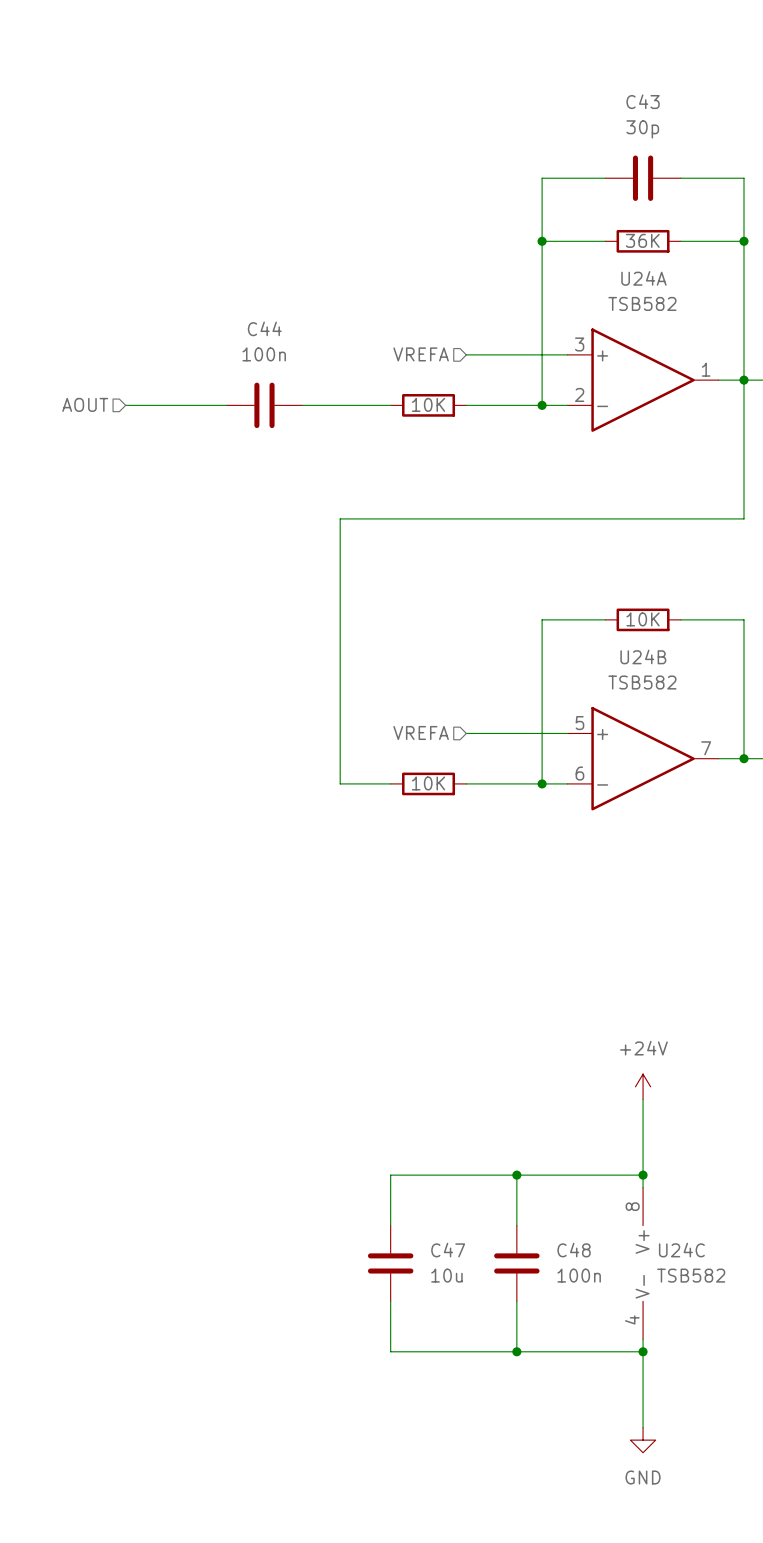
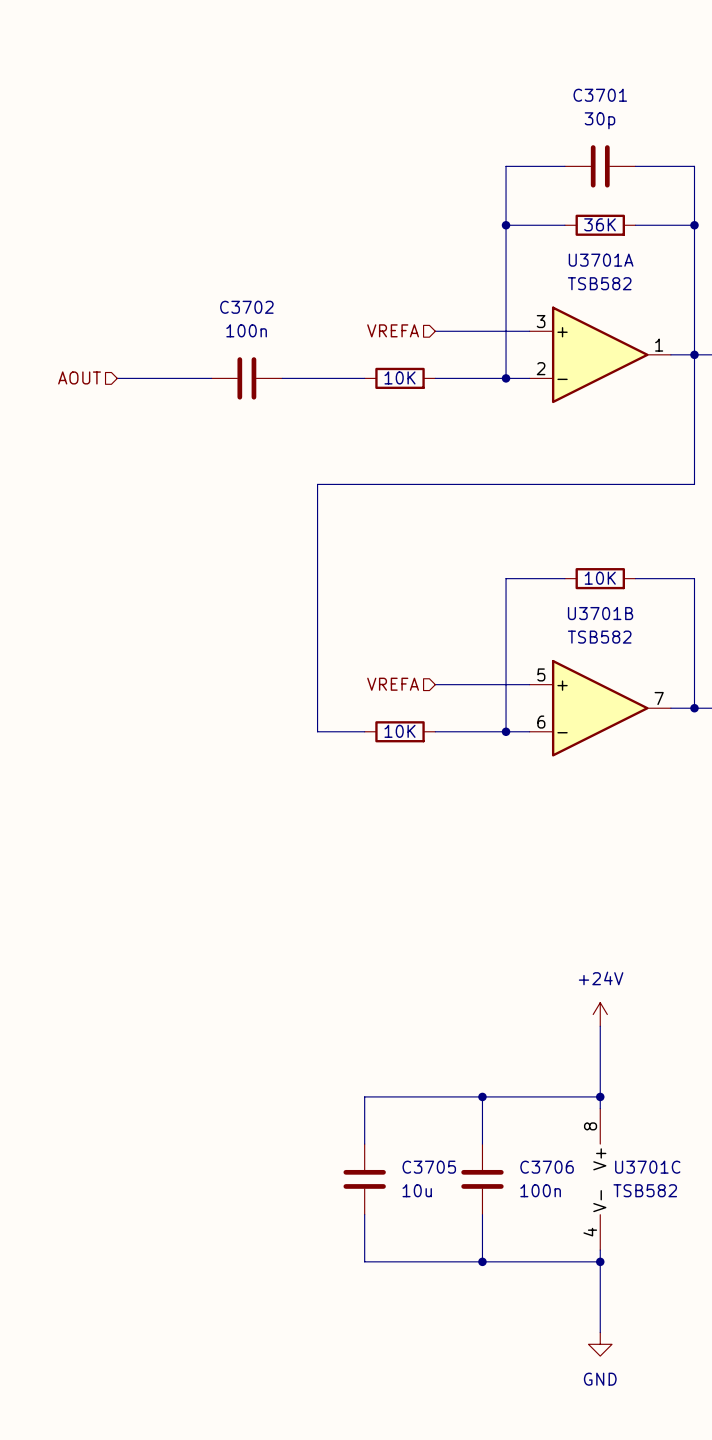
C43 name: C43 (643, 101) -> C3701 (600, 95)
U24A name: U24A (643, 278) -> U3701A (601, 260)
C44 name: C44 (264, 328) -> C3702 (246, 307)
U24B name: U24B (643, 656) -> U3701B (600, 613)
C47 name: C47 (448, 1250) -> C3705 (429, 1167)
C48 name: C48 (574, 1250) -> C3706 (547, 1167)
U24C name: U24C (681, 1250) -> U3701C (647, 1167)

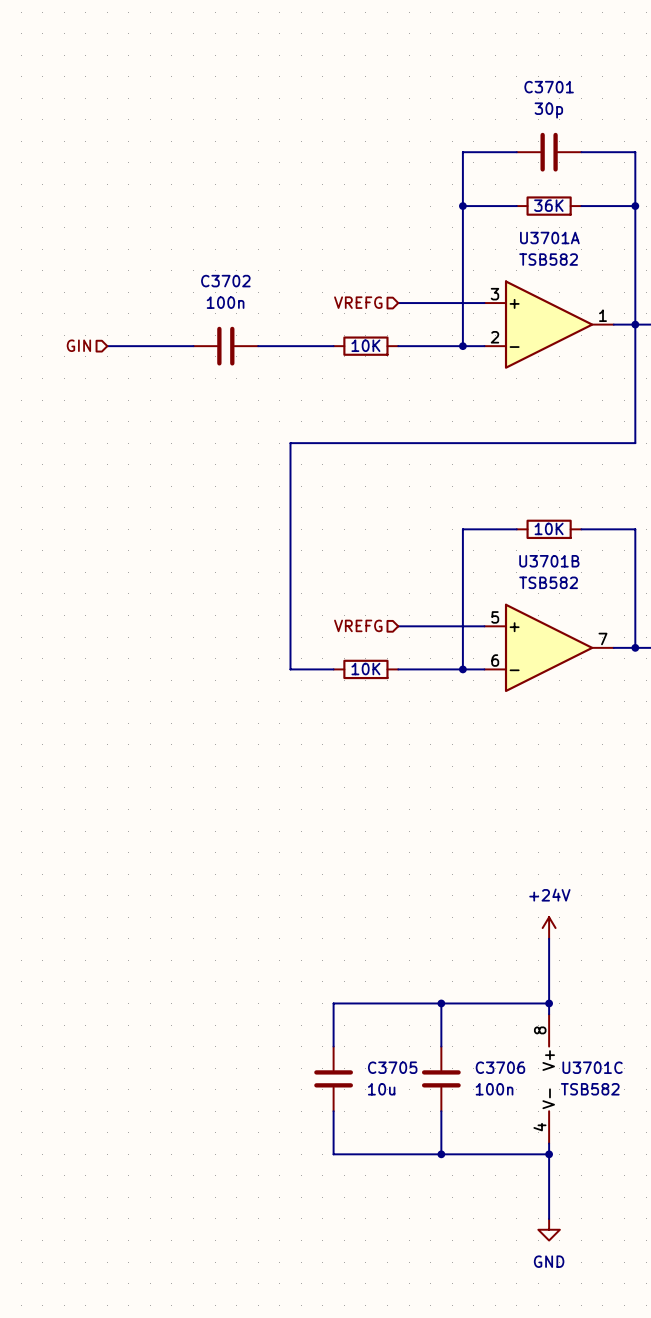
hierarchical label: VREFA (393, 330) -> VREFG (358, 302)
hierarchical label: AOUT (79, 377) -> GIN (78, 345)
hierarchical label: VREFA (393, 684) -> VREFG (358, 625)

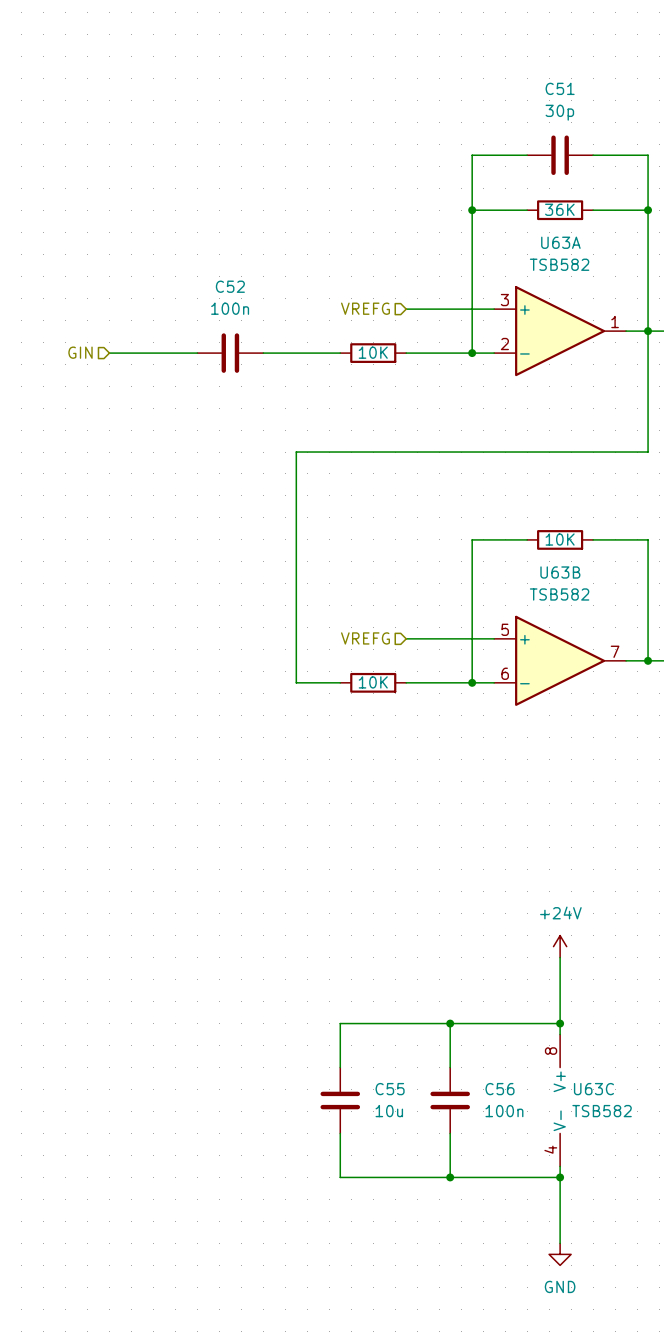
C3701 name: C3701 (549, 87) -> C51 (560, 88)
U3701A name: U3701A (549, 237) -> U63A (560, 242)
C3702 name: C3702 (225, 281) -> C52 (230, 286)
U3701B name: U3701B (549, 561) -> U63B (560, 572)
C3705 name: C3705 (392, 1067) -> C55 (390, 1089)
C3706 name: C3706 (500, 1067) -> C56 (500, 1089)
U3701C name: U3701C (592, 1067) -> U63C (593, 1089)

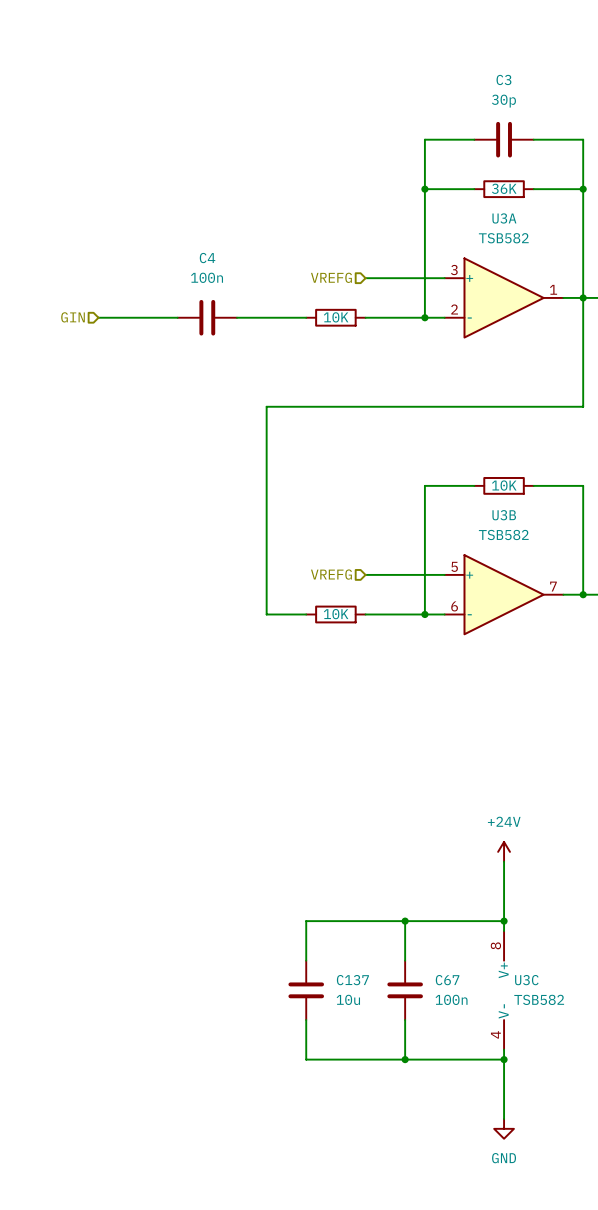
C51 name: C51 (560, 88) -> C3 (503, 79)
U63A name: U63A (560, 242) -> U3A (504, 218)
C52 name: C52 (230, 286) -> C4 (207, 258)
U63B name: U63B (560, 572) -> U3B (504, 515)
C55 name: C55 (390, 1089) -> C137 (352, 980)
C56 name: C56 (500, 1089) -> C67 (447, 980)
U63C name: U63C (593, 1089) -> U3C (526, 980)

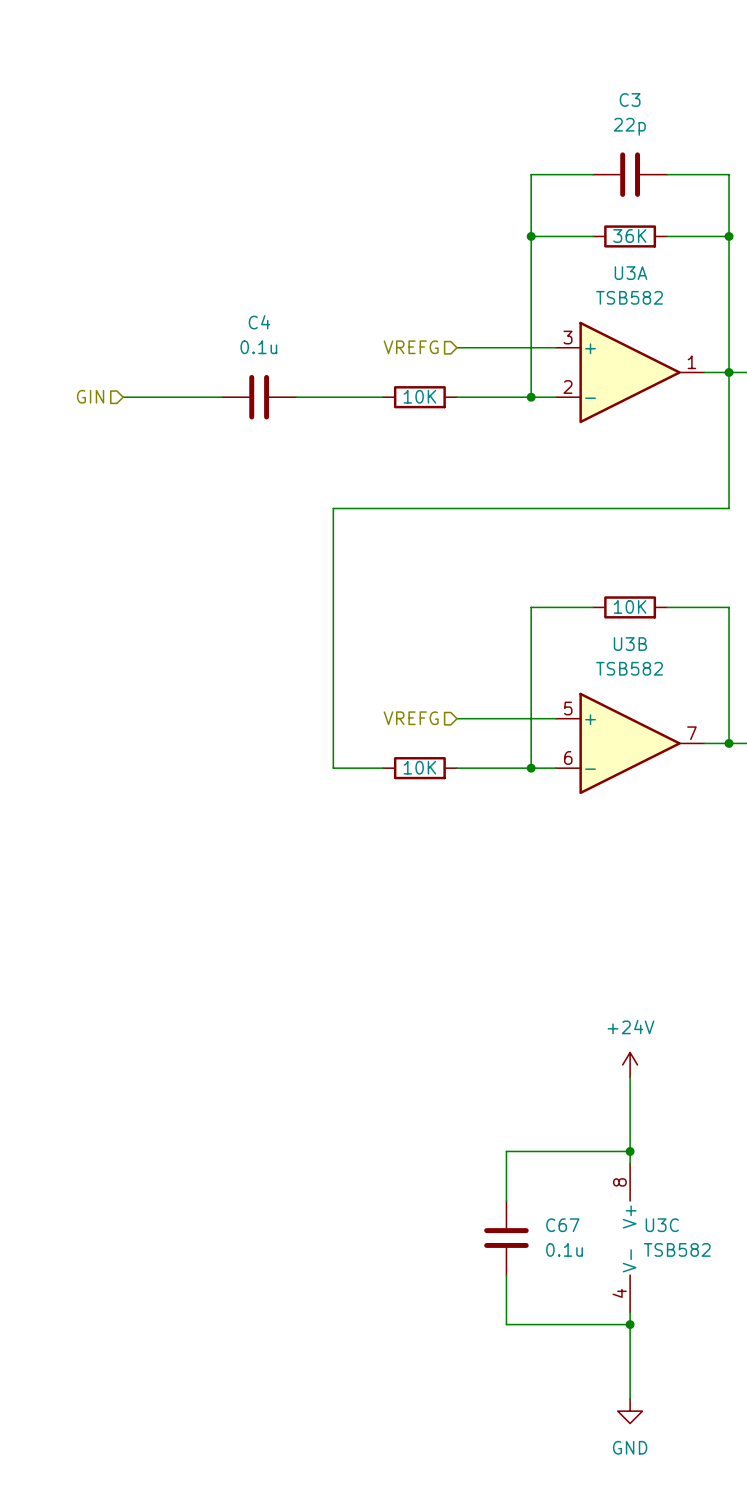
C3 value: 30p (503, 101) -> 22p (629, 126)
C4 value: 100n (207, 277) -> 0.1u (258, 347)
wire: (405, 921) (306, 921) (306, 960) -> none
junction: (405, 921) -> none
C137: 10u (306, 990) -> none
C67 value: 100n (451, 999) -> 0.1u (564, 1249)
wire: (306, 1020) (306, 1059) (405, 1059) -> none
junction: (405, 1059) -> none

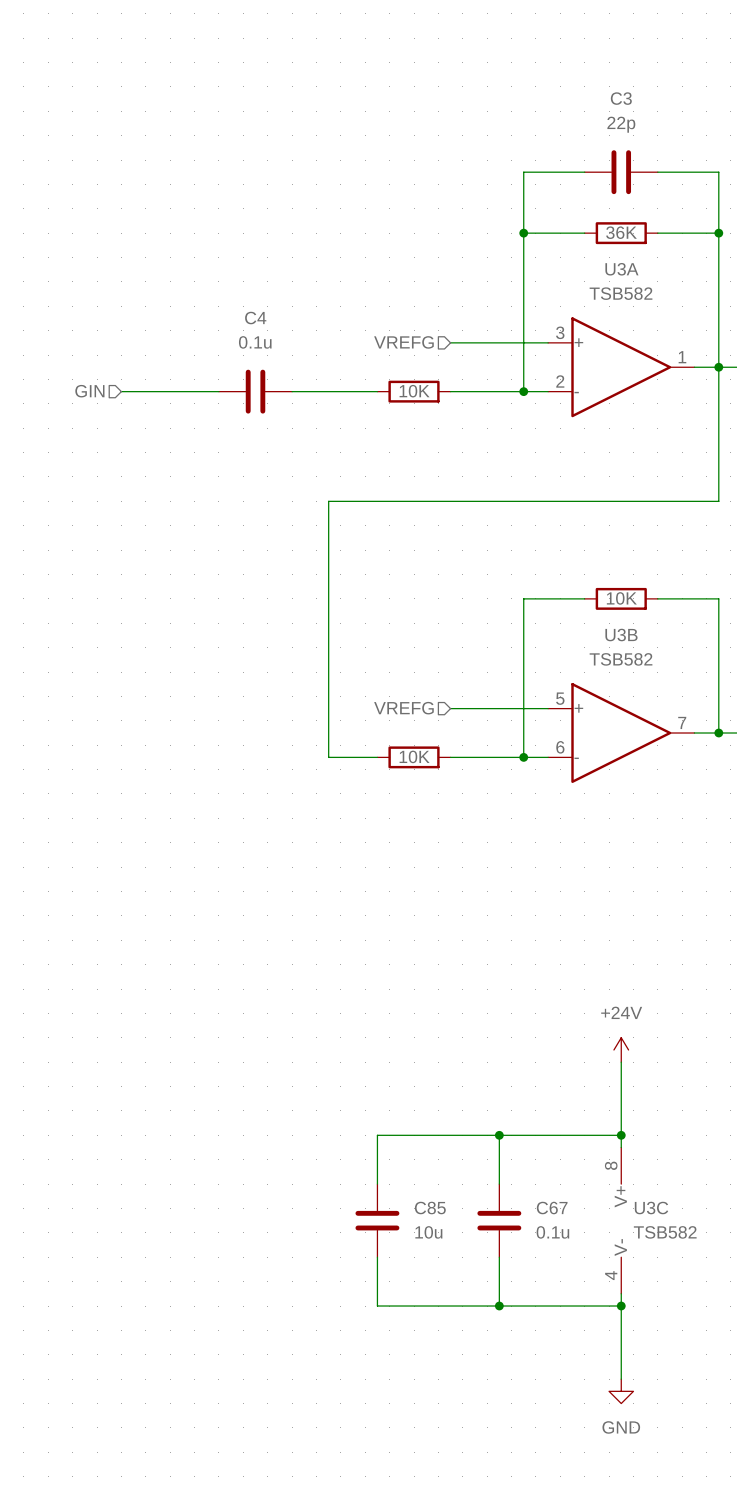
wire: none -> (499, 1135) (377, 1135) (377, 1184)
junction: none -> (499, 1135)
C85: none -> 10u (377, 1220)
wire: none -> (377, 1257) (377, 1306) (499, 1306)
junction: none -> (499, 1306)

